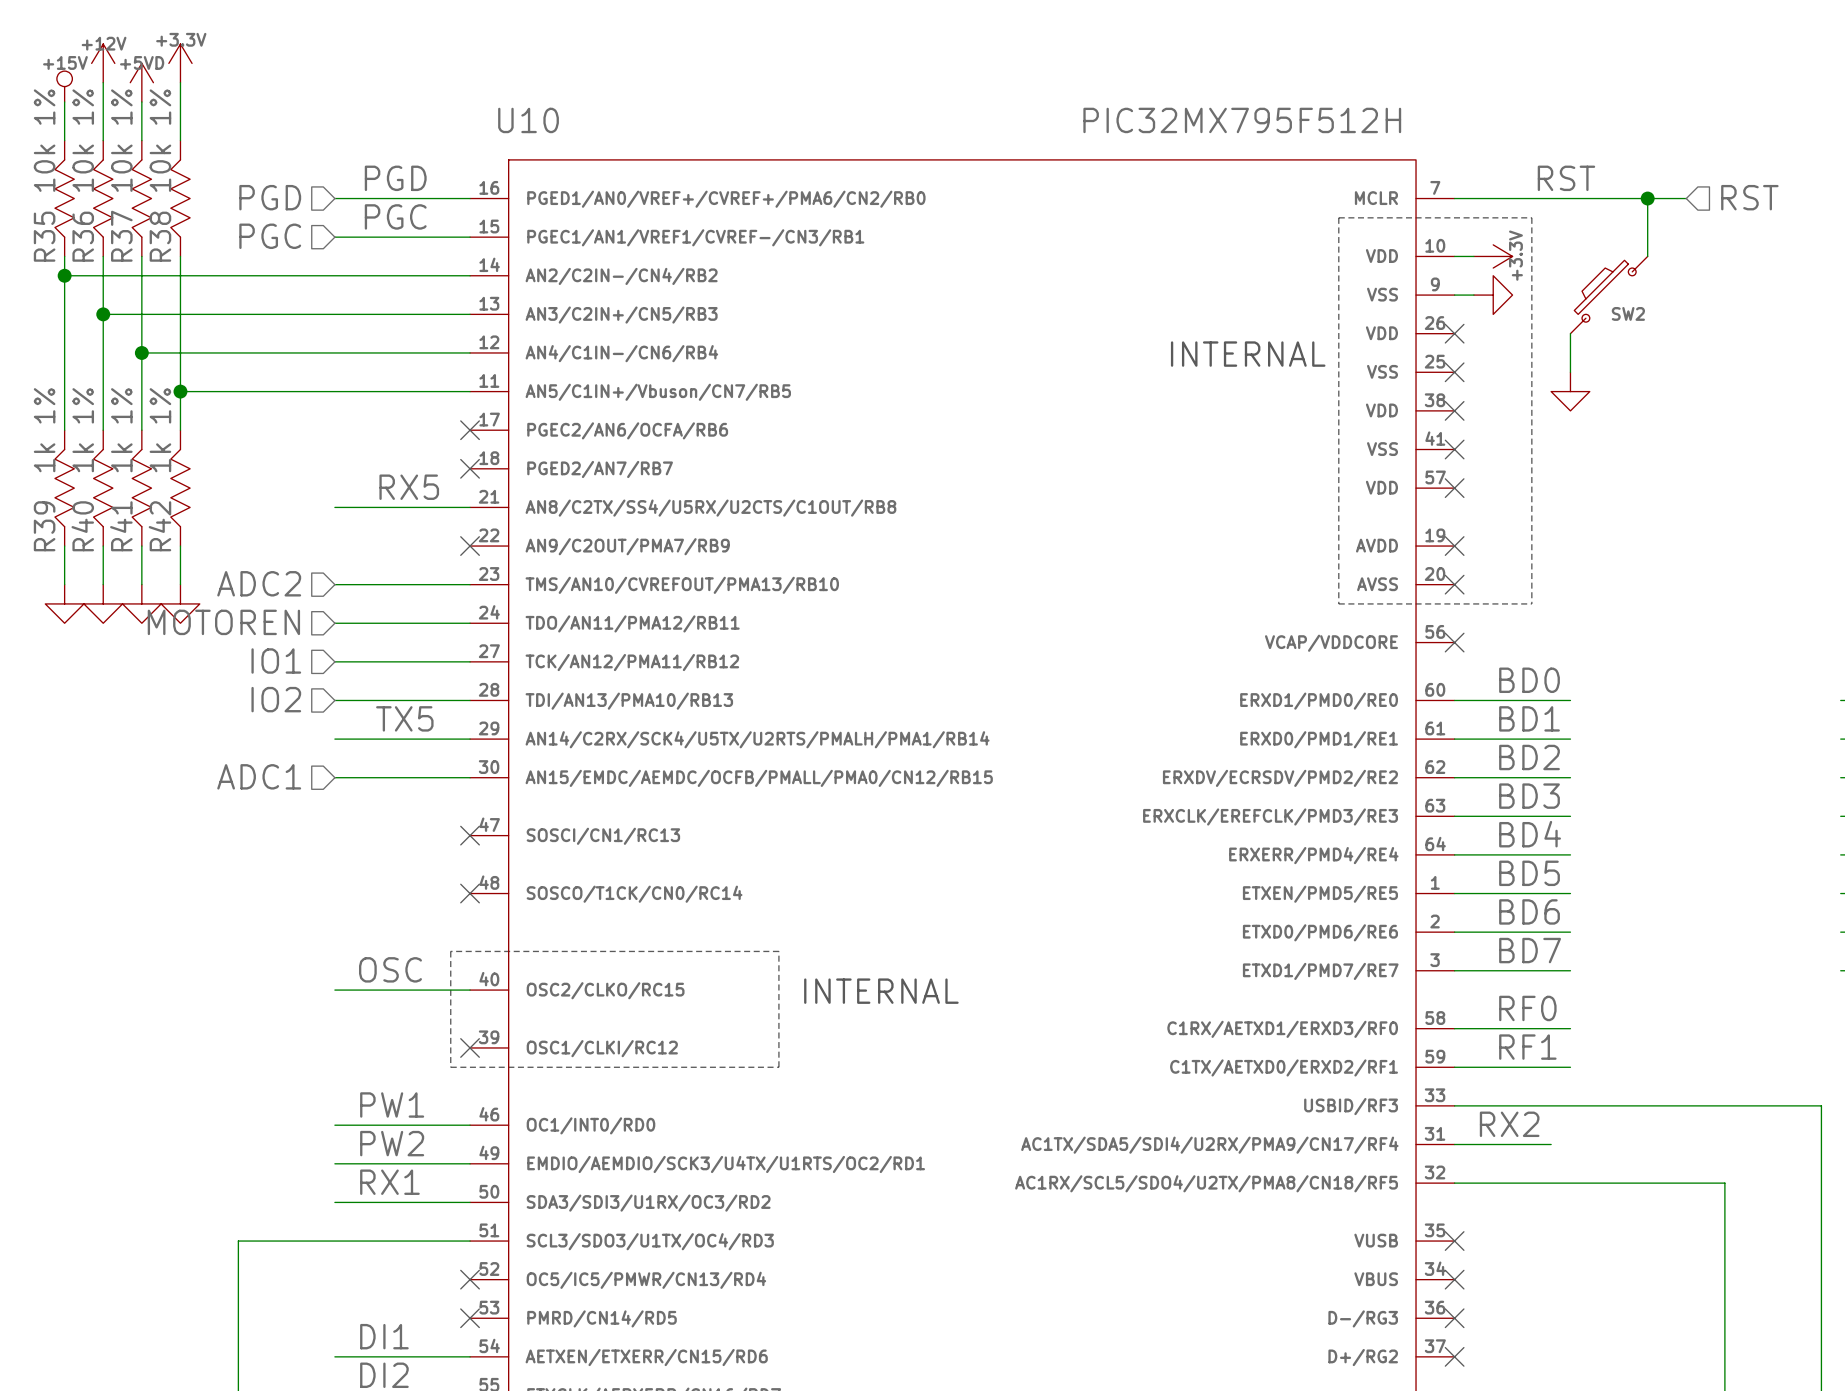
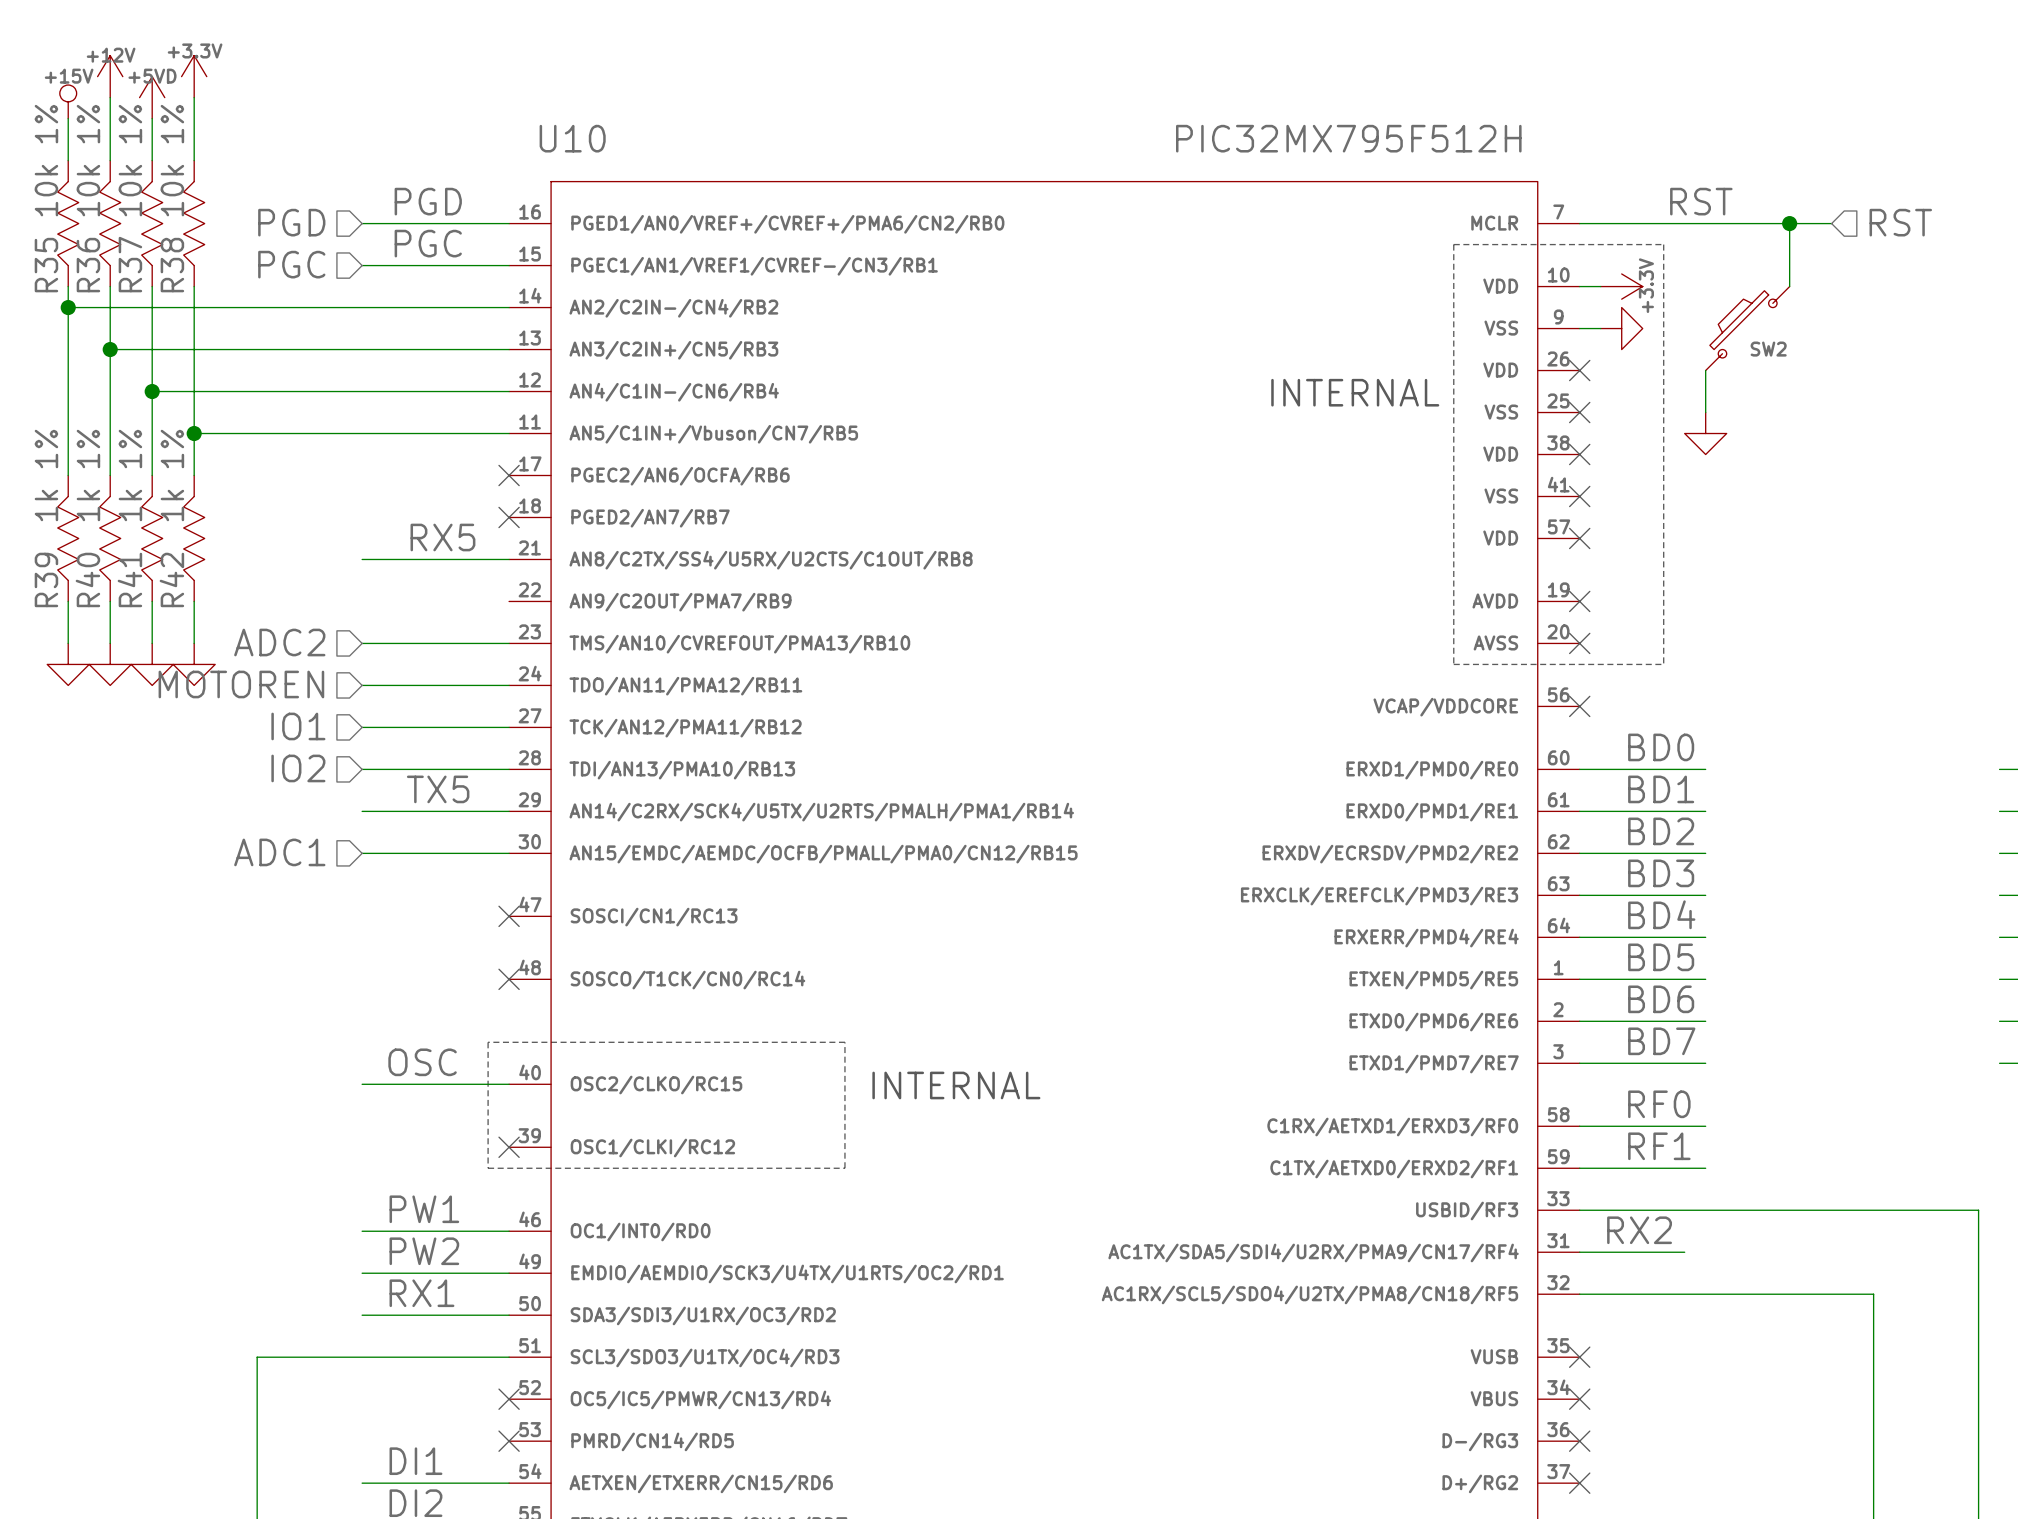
no-connect mark: (470, 546) -> none

